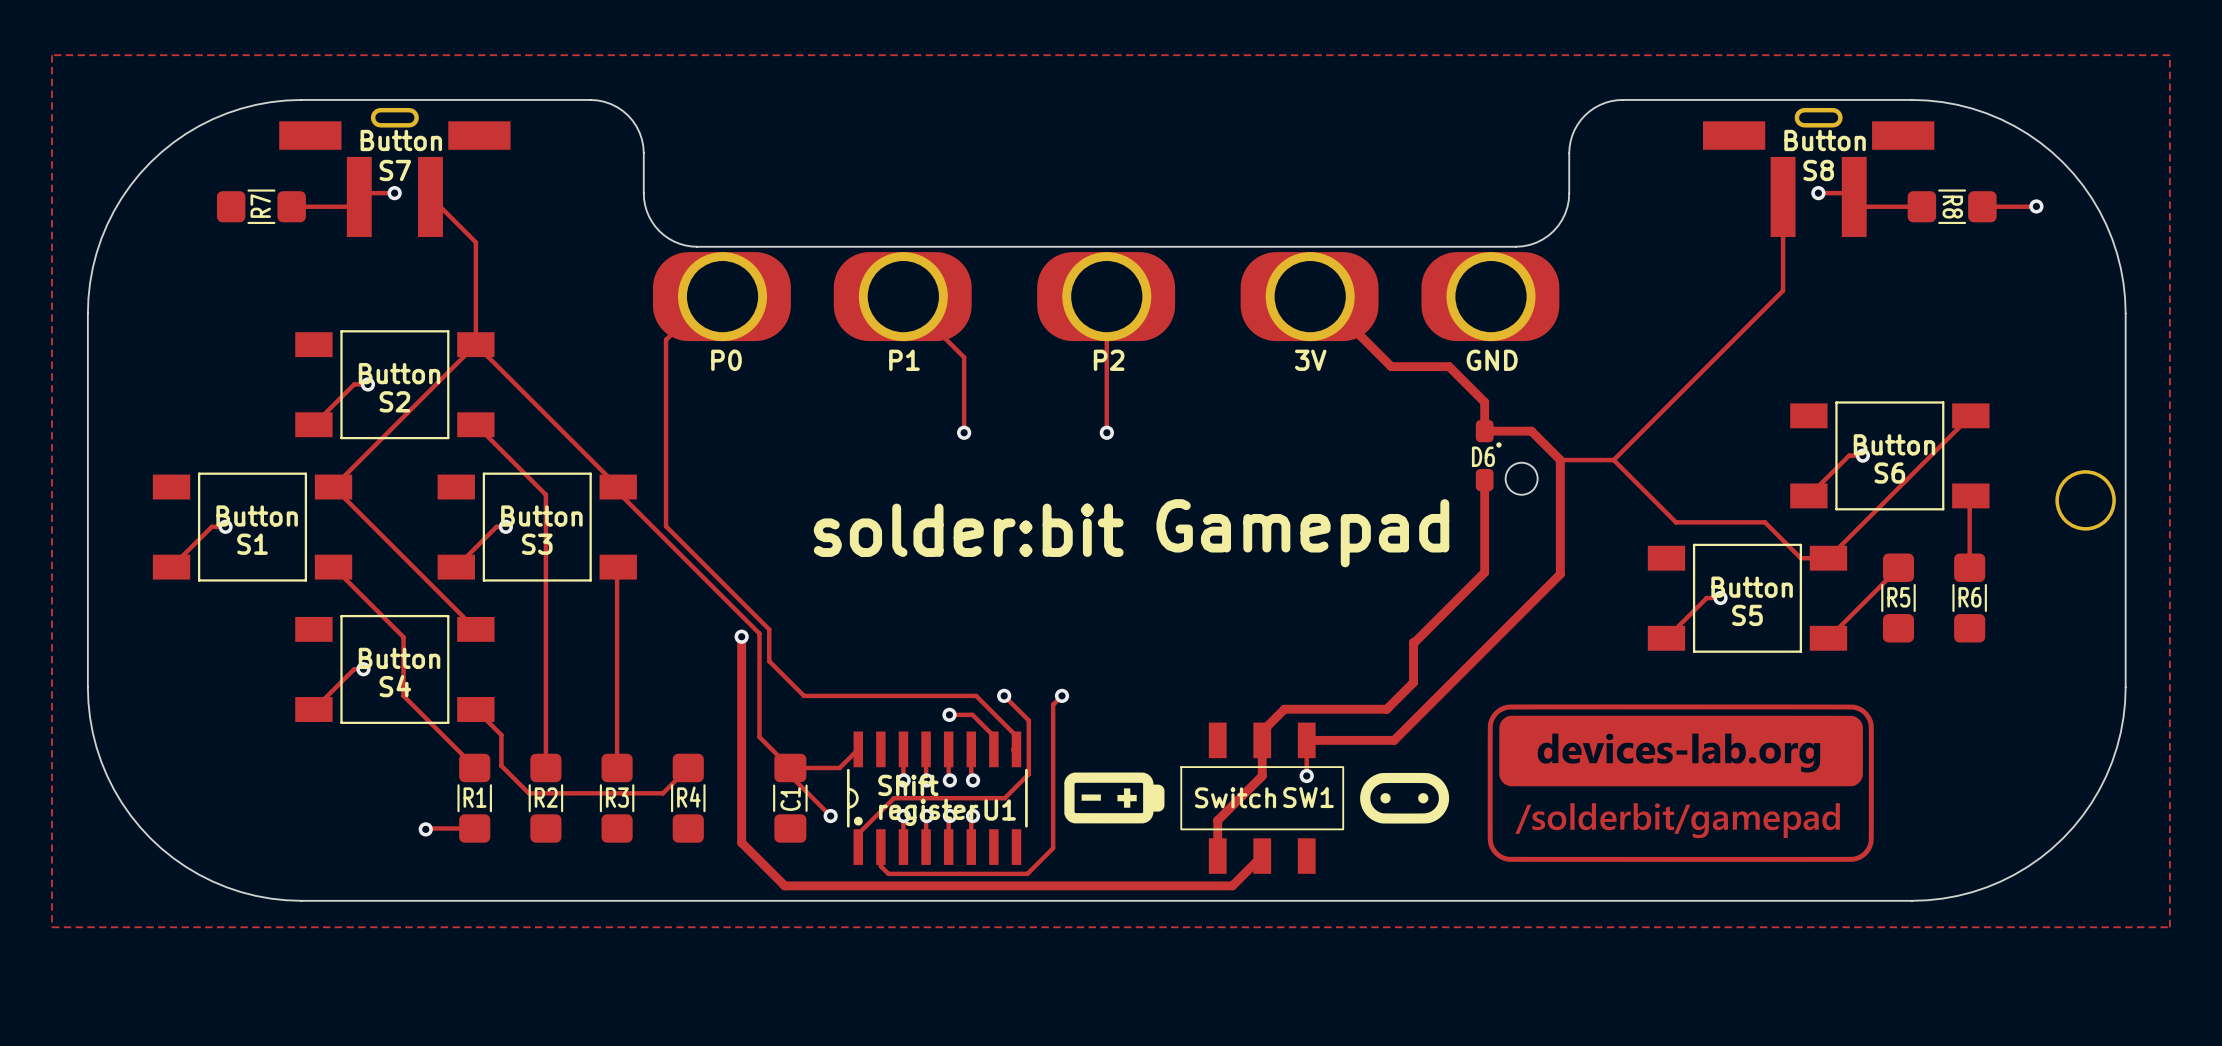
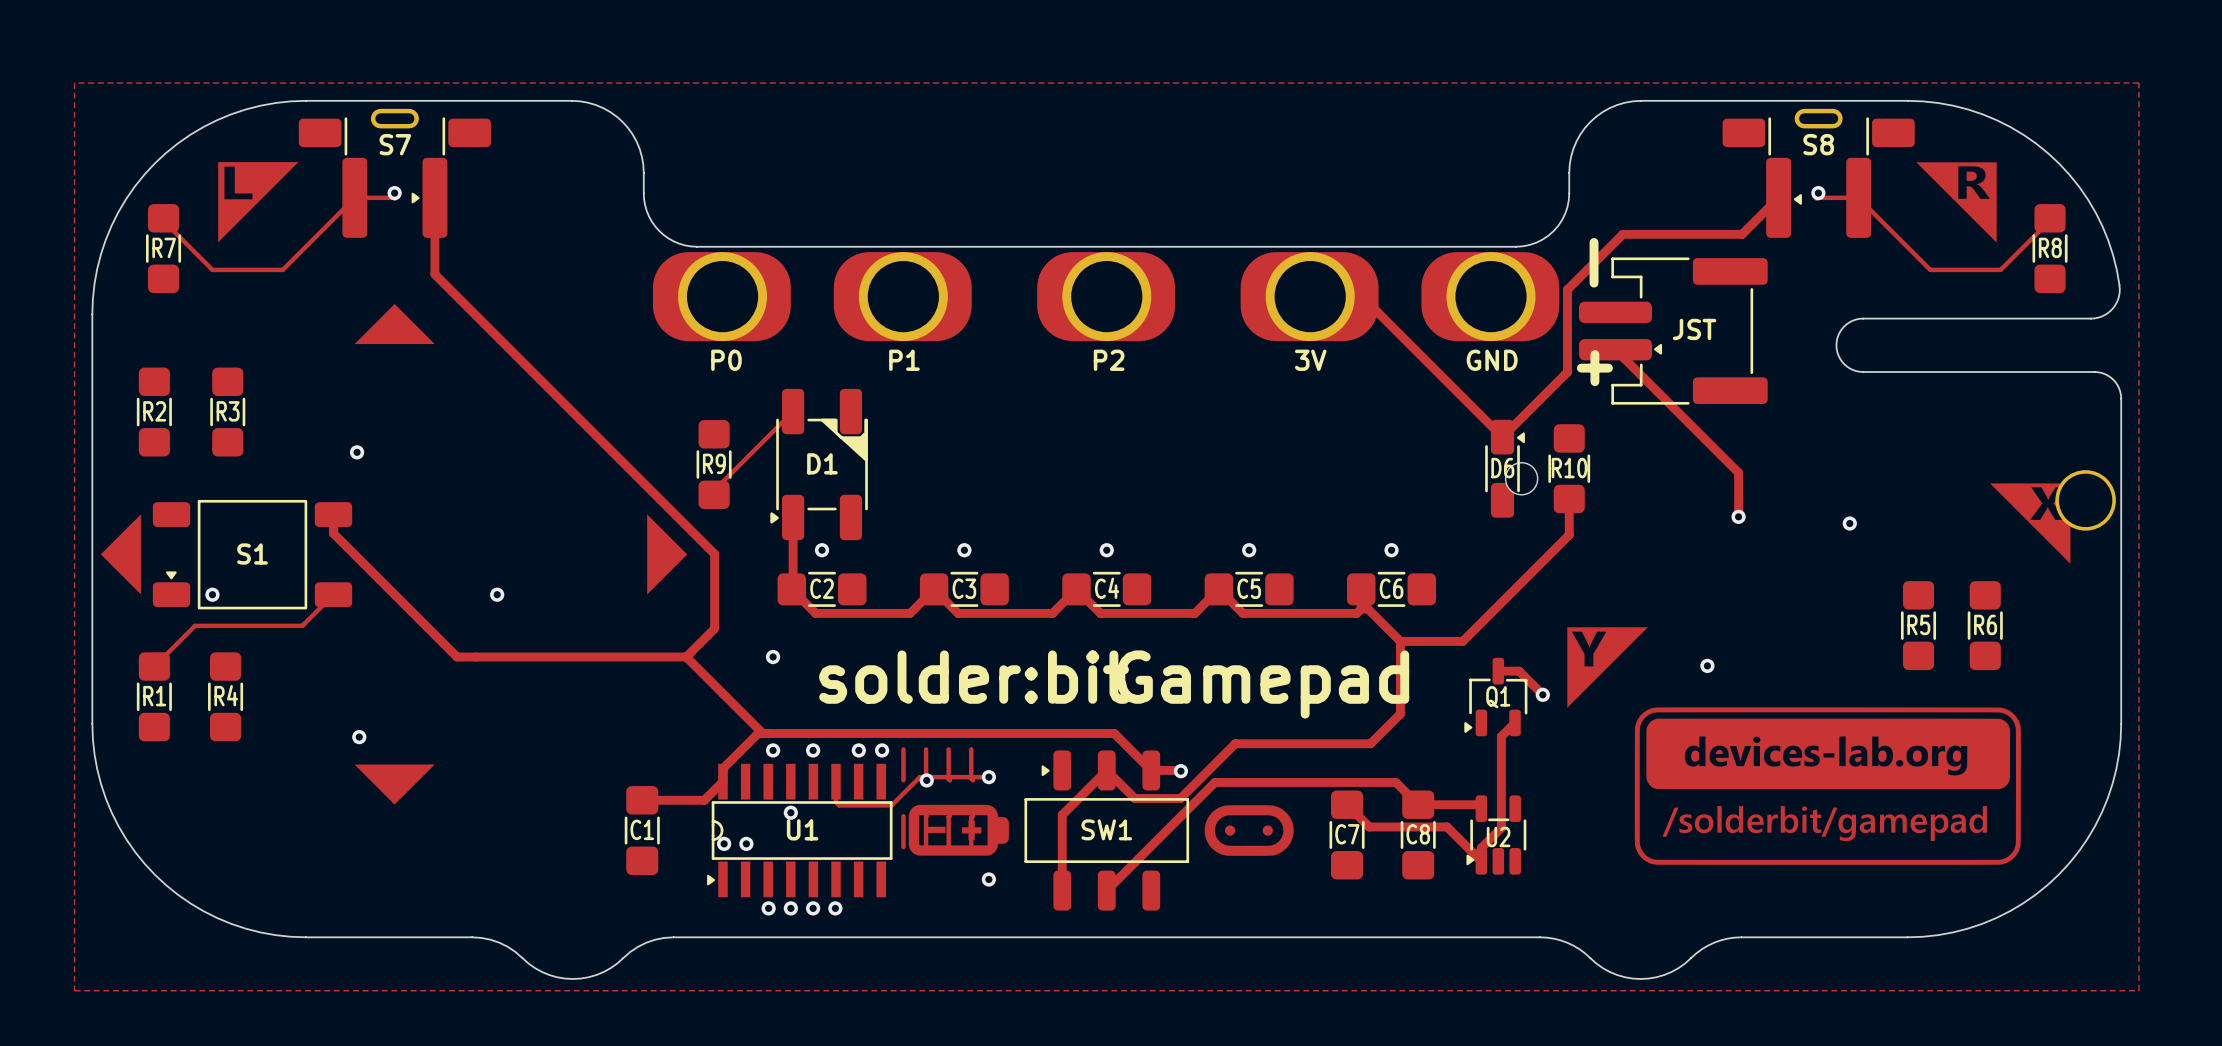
zone outline: (52, 55) (52, 927) (2169, 927) (2169, 55) (52, 55) -> (74, 83) (74, 990) (2139, 990) (2139, 83) (74, 83)
S7 footprint: [279, 107, 511, 237] -> [298, 108, 491, 238]
S8 footprint: [1702, 107, 1935, 237] -> [1722, 108, 1915, 238]
drawing: none -> [218, 162, 299, 243]
drawing: none -> [1916, 162, 1997, 243]
board edge: (643, 172) (643, 146) (636, 126) (622, 110) (604, 101) (590, 99) (286, 100) (241, 108) (212, 119) (185, 133) (150, 162) (121, 198) (107, 224) (96, 253) (88, 298) (88, 702) (92, 732) (101, 761) (121, 802) (150, 838) (185, 866) (212, 881) (241, 892) (271, 898) (301, 900) (1912, 900) (1942, 898) (1972, 892) (2000, 881) (2027, 866) (2051, 848) (2073, 827) (2099, 789) (2117, 747) (2125, 702) (2125, 298) (2117, 253) (2106, 224) (2091, 198) (2063, 162) (2027, 133) (1986, 113) (1957, 104) (1927, 100) (1610, 101) (1594, 108) (1577, 124) (1570, 141) (1569, 172) -> (643, 172) (642, 156) (636, 141) (622, 122) (603, 108) (588, 102) (572, 100) (305, 100) (275, 103) (245, 109) (217, 120) (190, 134) (154, 163) (134, 186) (118, 212) (105, 239) (94, 284) (92, 314) (92, 738) (97, 769) (105, 798) (118, 826) (134, 851) (154, 874) (177, 894) (203, 911) (231, 923) (260, 932) (290, 936) (481, 937) (507, 946) (541, 971) (557, 977) (572, 979) (588, 977) (603, 971) (646, 942) (673, 937)
board edge: none -> (1569, 172) (1573, 149) (1584, 128) (1602, 112) (1624, 102) (1640, 100) (1907, 100) (1938, 103) (1968, 109) (1996, 120) (2023, 134) (2048, 153) (2069, 175) (2088, 199) (2108, 240) (2116, 270) (2119, 288) (2118, 299) (2110, 311) (2097, 317) (1859, 318) (1849, 322) (1841, 329) (1836, 345) (1841, 361) (1849, 368) (1859, 371) (2094, 371) (2107, 375) (2117, 385) (2121, 398) (2120, 738) (2112, 783) (2095, 826) (2078, 851) (2047, 885) (2010, 911) (1967, 928) (1922, 936) (1741, 937)
R7 footprint: [216, 189, 306, 224] -> [145, 204, 182, 294]
R8 footprint: [1907, 189, 1997, 224] -> [2032, 204, 2068, 294]
track: (394, 193) (363, 193) (349, 206) (291, 206) -> none
track: (1818, 193) (1850, 193) (1864, 206) (1921, 206) -> none
track: (1783, 196) (1783, 290) (1613, 460) -> none
track: none -> (434, 197) (434, 274) (714, 554) (714, 628) (686, 657)
track: none -> (1858, 197) (1930, 269) (2000, 269) (2049, 220) (2049, 218)
track: none -> (1858, 197) (1816, 198)
track: none -> (394, 198) (354, 197) (282, 269) (212, 269) (163, 220) (163, 218)
track: (437, 203) (475, 242) (475, 344) -> none
track: (2036, 206) (1982, 206) -> none
via: (2036, 206) -> none
track: (715, 290) (666, 339) (666, 526) (769, 629) (769, 661) (803, 695) (976, 695) (1016, 736) (1016, 749) (1013, 749) -> none
track: (903, 296) (964, 357) (964, 432) -> none
track: (1106, 296) (1106, 432) -> none
track: (1321, 296) (1391, 366) (1449, 366) (1484, 402) (1484, 431) (1531, 431) (1560, 460) -> (1321, 296) (1361, 296) (1502, 437) (1567, 372) (1567, 289) (1622, 234) (1742, 234) (1778, 197)
drawing: none -> [354, 304, 435, 345]
part: none -> (1673, 331)
track: (475, 344) (333, 487) (475, 629) -> none
track: (475, 344) (618, 487) (618, 492) (759, 633) (759, 737) (790, 767) -> none
track: none -> (1615, 349) (1738, 472) (1738, 516)
track: (367, 384) (354, 384) (313, 424) -> none
via position: (367, 384) -> (357, 452)
S2: (394, 384) -> none
track: none -> (793, 411) (714, 490) (714, 494)
track: (1970, 415) (1828, 558) (1800, 558) (1765, 522) (1676, 522) (1613, 460) -> none
D6 footprint: [1475, 420, 1502, 492] -> [1485, 419, 1525, 518]
track: (475, 424) (545, 494) (545, 767) -> none
via: (964, 432) -> none
via: (1106, 432) -> none
track: (1862, 455) (1849, 455) (1808, 495) (1805, 495) -> none
via: (1862, 455) -> none
S6: (1889, 455) -> none
track: (1560, 460) (1613, 460) -> none
track: (1560, 460) (1560, 574) (1394, 740) (1306, 740) (1306, 775) -> none
R9: none -> (714, 464)
D1: none -> (819, 464)
R10: none -> (1569, 468)
S1 footprint: [152, 472, 353, 582] -> [152, 499, 353, 610]
track: (1484, 480) (1484, 572) (1413, 642) (1413, 682) (1386, 709) (1284, 709) (1262, 731) (1262, 775) (1217, 820) (1217, 856) -> none
drawing: none -> [1990, 483, 2071, 564]
track: (1970, 495) (1969, 567) -> none
track: none -> (1569, 498) (1569, 534) (1462, 641) (1400, 641)
drawing: none -> [100, 514, 141, 595]
track: none -> (333, 514) (333, 533) (457, 657) (686, 657)
drawing: none -> [647, 514, 688, 595]
via: none -> (1738, 516)
track: none -> (793, 517) (791, 589) (815, 613) (910, 613) (935, 588)
via: none -> (1849, 523)
track: (225, 526) (211, 526) (171, 567) (185, 567) -> none
via position: (225, 526) -> (212, 594)
track: (505, 526) (496, 526) (456, 567) -> none
via position: (505, 526) -> (497, 594)
S3: (537, 527) -> none
text position: solder:bit (968, 530) -> solder:bit (974, 677)
text position: Gamepad (1302, 533) -> Gamepad (1262, 684)
via: none -> (822, 550)
via: none -> (964, 550)
via: none -> (1106, 550)
via: none -> (1249, 550)
via: none -> (1391, 550)
R5 footprint: [1881, 553, 1916, 643] -> [1900, 581, 1937, 671]
R6 footprint: [1952, 553, 1987, 643] -> [1967, 581, 2003, 671]
track: (333, 567) (403, 637) (403, 695) (474, 767) -> none
track: (618, 567) (617, 767) -> none
track: (1898, 567) (1828, 638) -> none
track: none -> (1077, 588) (1052, 613) (958, 613) (934, 589)
track: none -> (1220, 588) (1194, 613) (1100, 613) (1076, 589)
C2: none -> (822, 589)
C3: none -> (964, 589)
C4: none -> (1106, 589)
track: none -> (1218, 589) (1242, 613) (1356, 613) (1361, 608)
C5: none -> (1249, 589)
C6: none -> (1391, 589)
track: none -> (333, 594) (302, 625) (195, 625) (154, 666)
track: (1720, 598) (1706, 598) (1666, 638) -> none
via: (1720, 598) -> none
S5: (1747, 598) -> none
track: none -> (1361, 608) (1367, 608) (1400, 641)
drawing: none -> [1567, 627, 1648, 708]
track: (741, 636) (741, 842) (784, 885) (1232, 885) (1262, 856) -> none
via position: (741, 636) -> (773, 657)
track: none -> (1400, 641) (1400, 713) (1370, 743) (1235, 743) (1180, 798) (1134, 798) (1106, 770) (1062, 814) (1062, 890)
track: none -> (686, 657) (762, 733)
via: none -> (1707, 665)
track: (363, 669) (354, 669) (313, 709) (323, 709) -> none
via: (363, 669) -> none
S4: (394, 669) -> none
track: none -> (1498, 671) (1519, 671) (1542, 694)
via: none -> (1542, 694)
track: (1004, 695) (1028, 720) (1028, 774) (1004, 798) (893, 798) (858, 833) (858, 847) -> none
via: (1004, 695) -> none
track: (1062, 695) (1053, 704) (1053, 848) (1027, 873) (888, 873) (880, 866) (880, 847) -> none
via: (1062, 695) -> none
Q1: none -> (1495, 697)
track: (475, 709) (501, 735) (501, 765) (528, 793) (662, 793) (688, 767) -> none
track: (949, 714) (972, 714) (993, 736) (993, 749) -> none
via: (949, 714) -> none
SW1 footprint: [1064, 722, 1450, 874] -> [908, 750, 1294, 911]
track: none -> (1514, 722) (1501, 736) (1501, 827) (1481, 847) (1481, 861) (1447, 826) (1369, 826) (1347, 804)
U1 footprint: [846, 731, 1028, 865] -> [707, 763, 893, 898]
via: none -> (359, 737)
track: (858, 749) (839, 767) (790, 767) -> none
via: none -> (773, 750)
via: none -> (813, 750)
via: none -> (858, 750)
via: none -> (882, 750)
R1 footprint: [457, 753, 492, 843] -> [136, 652, 172, 742]
R2 footprint: [528, 753, 564, 843] -> [136, 367, 172, 457]
R3 footprint: [599, 753, 635, 843] -> [210, 367, 246, 457]
R4 footprint: [671, 753, 706, 843] -> [208, 652, 244, 742]
C1 footprint: [773, 753, 808, 843] -> [624, 786, 660, 876]
drawing: none -> [354, 764, 435, 805]
track: (790, 767) (790, 775) (830, 816) -> none
track: none -> (1180, 771) (1151, 770) (1114, 733) (758, 733) (723, 768) (723, 781) (704, 800) (642, 800)
via: none -> (1180, 771)
via: (1306, 775) -> none
track: none -> (988, 777) (919, 777) (891, 805) (839, 805) (836, 802) (836, 781)
via: (903, 780) -> none
via: (949, 780) -> none
via position: (973, 780) -> (988, 777)
drawing position: (1680, 783) -> (1827, 786)
SW1 name position: SW1 (1308, 797) -> SW1 (1106, 829)
track: none -> (1481, 808) (1477, 804) (1418, 804) (1395, 782) (1214, 782) (1106, 890)
U1 name position: U1 (1000, 810) -> U1 (802, 829)
via: none -> (790, 812)
via: (830, 816) -> none
via: (903, 816) -> none
via: (926, 816) -> none
via: (949, 816) -> none
via: (973, 816) -> none
track: (474, 828) (425, 829) -> none
via: (425, 829) -> none
C7: none -> (1347, 834)
C8: none -> (1418, 834)
U2: none -> (1496, 834)
via: none -> (724, 843)
via: none -> (746, 843)
via: none -> (988, 879)
via: none -> (768, 908)
via: none -> (790, 908)
via: none -> (813, 908)
via: none -> (835, 908)
board edge: none -> (673, 937) (1540, 937) (1567, 942) (1579, 949) (1609, 971) (1624, 977) (1640, 979) (1656, 977) (1671, 971) (1701, 949) (1714, 942) (1741, 937)

